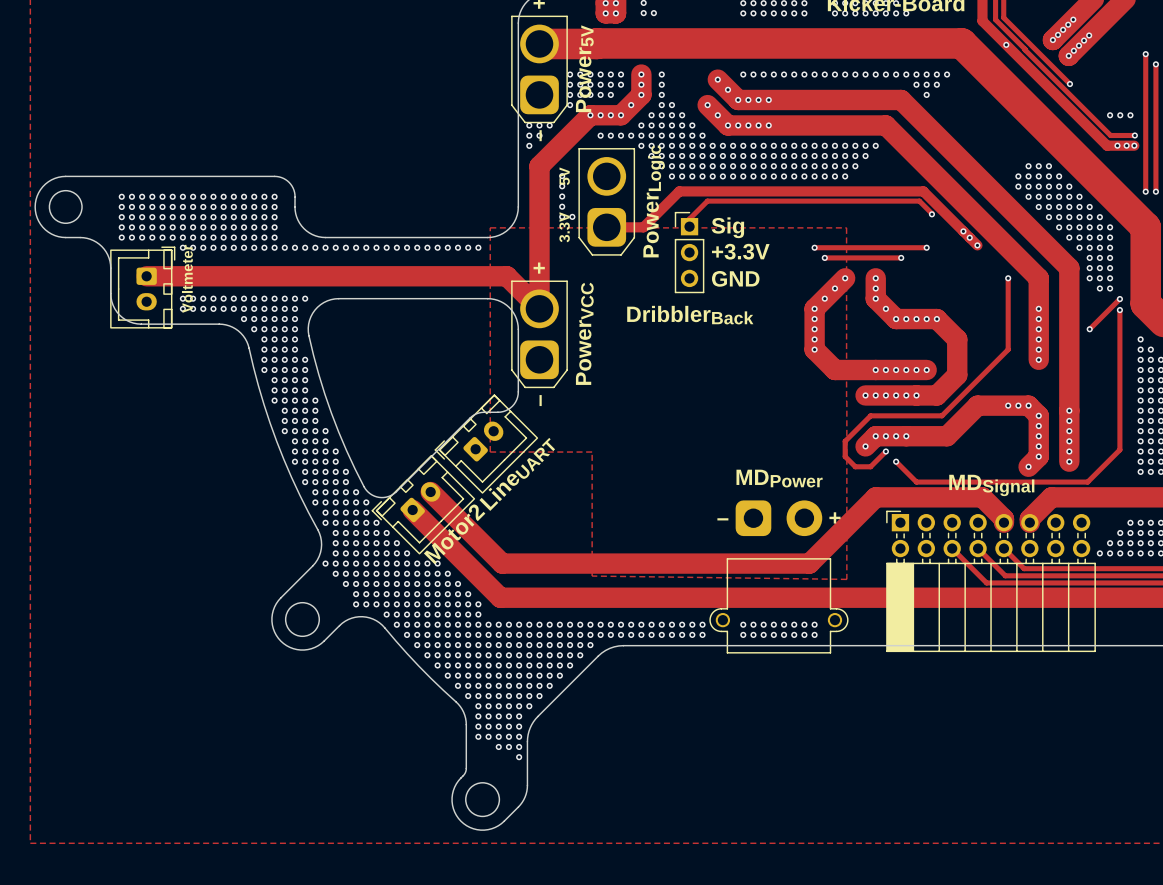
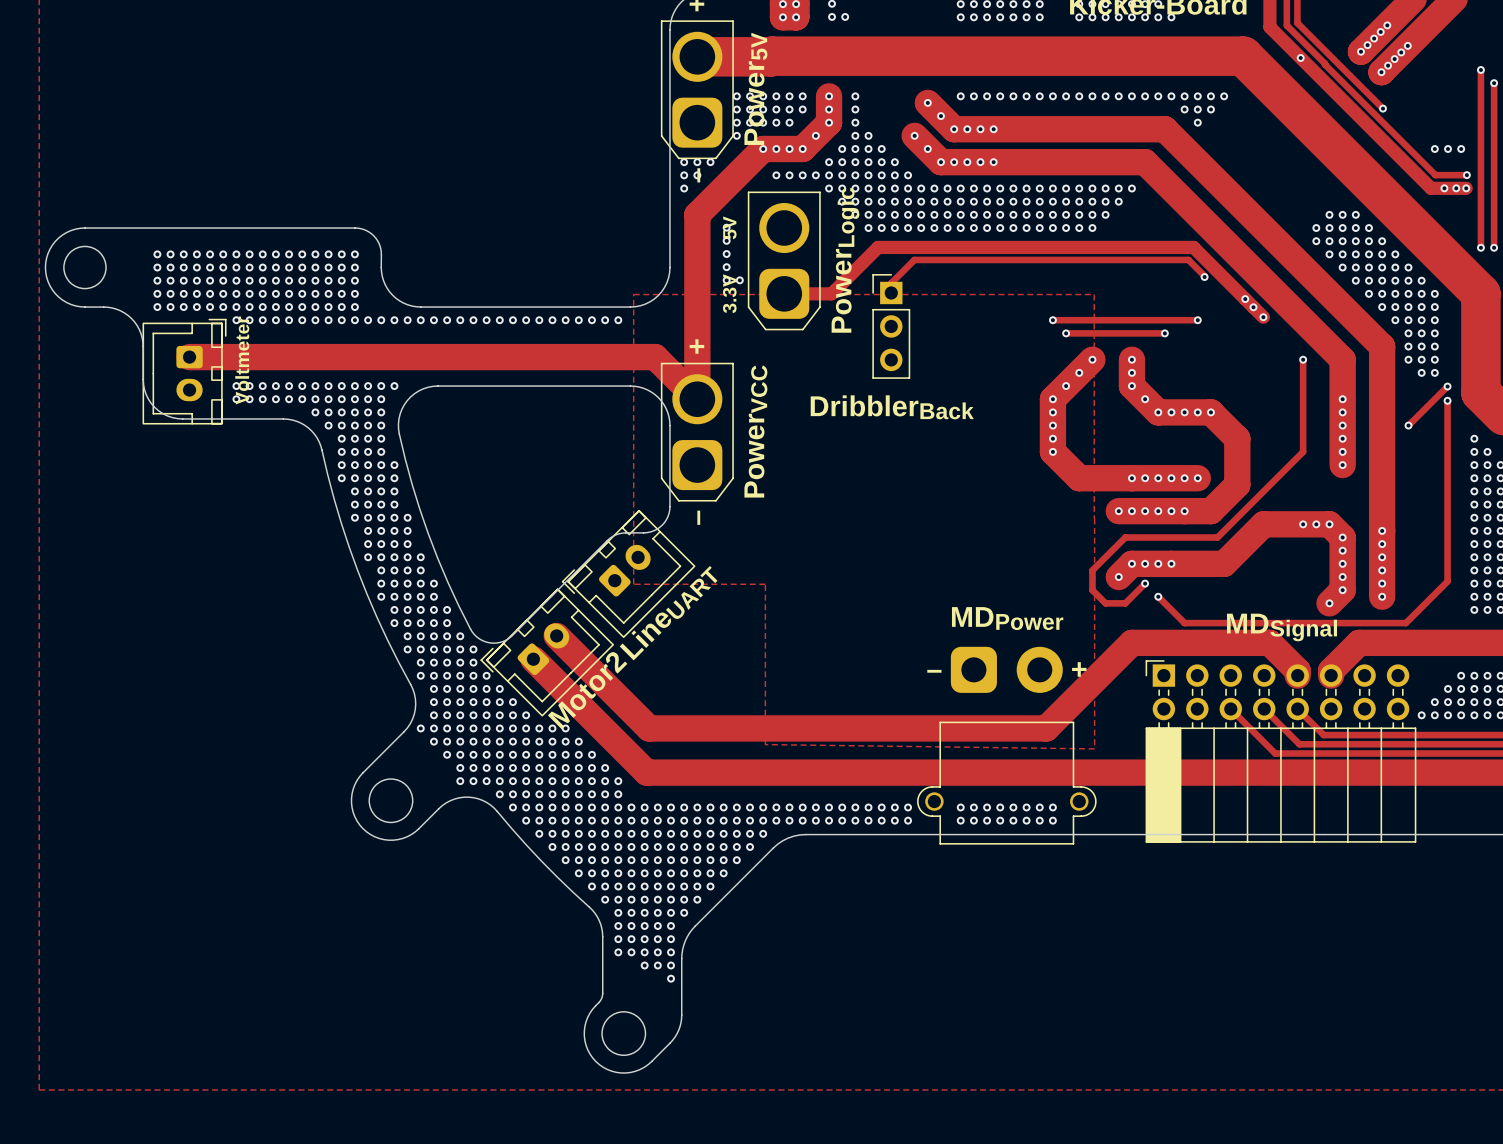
text: Sig (727, 227) -> none
text: +3.3V (740, 251) -> none
text: GND (735, 278) -> none

